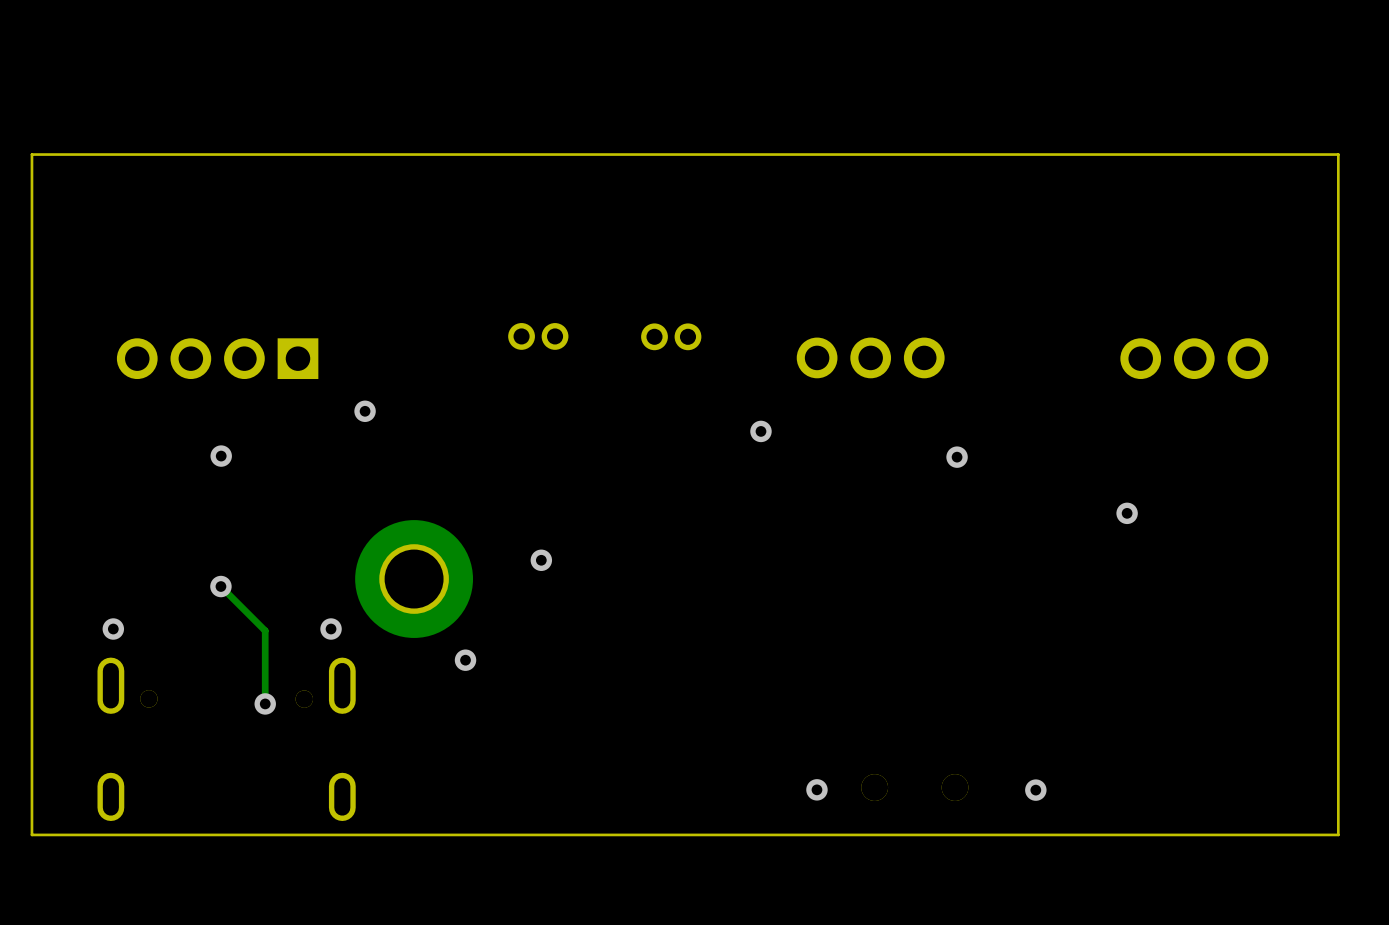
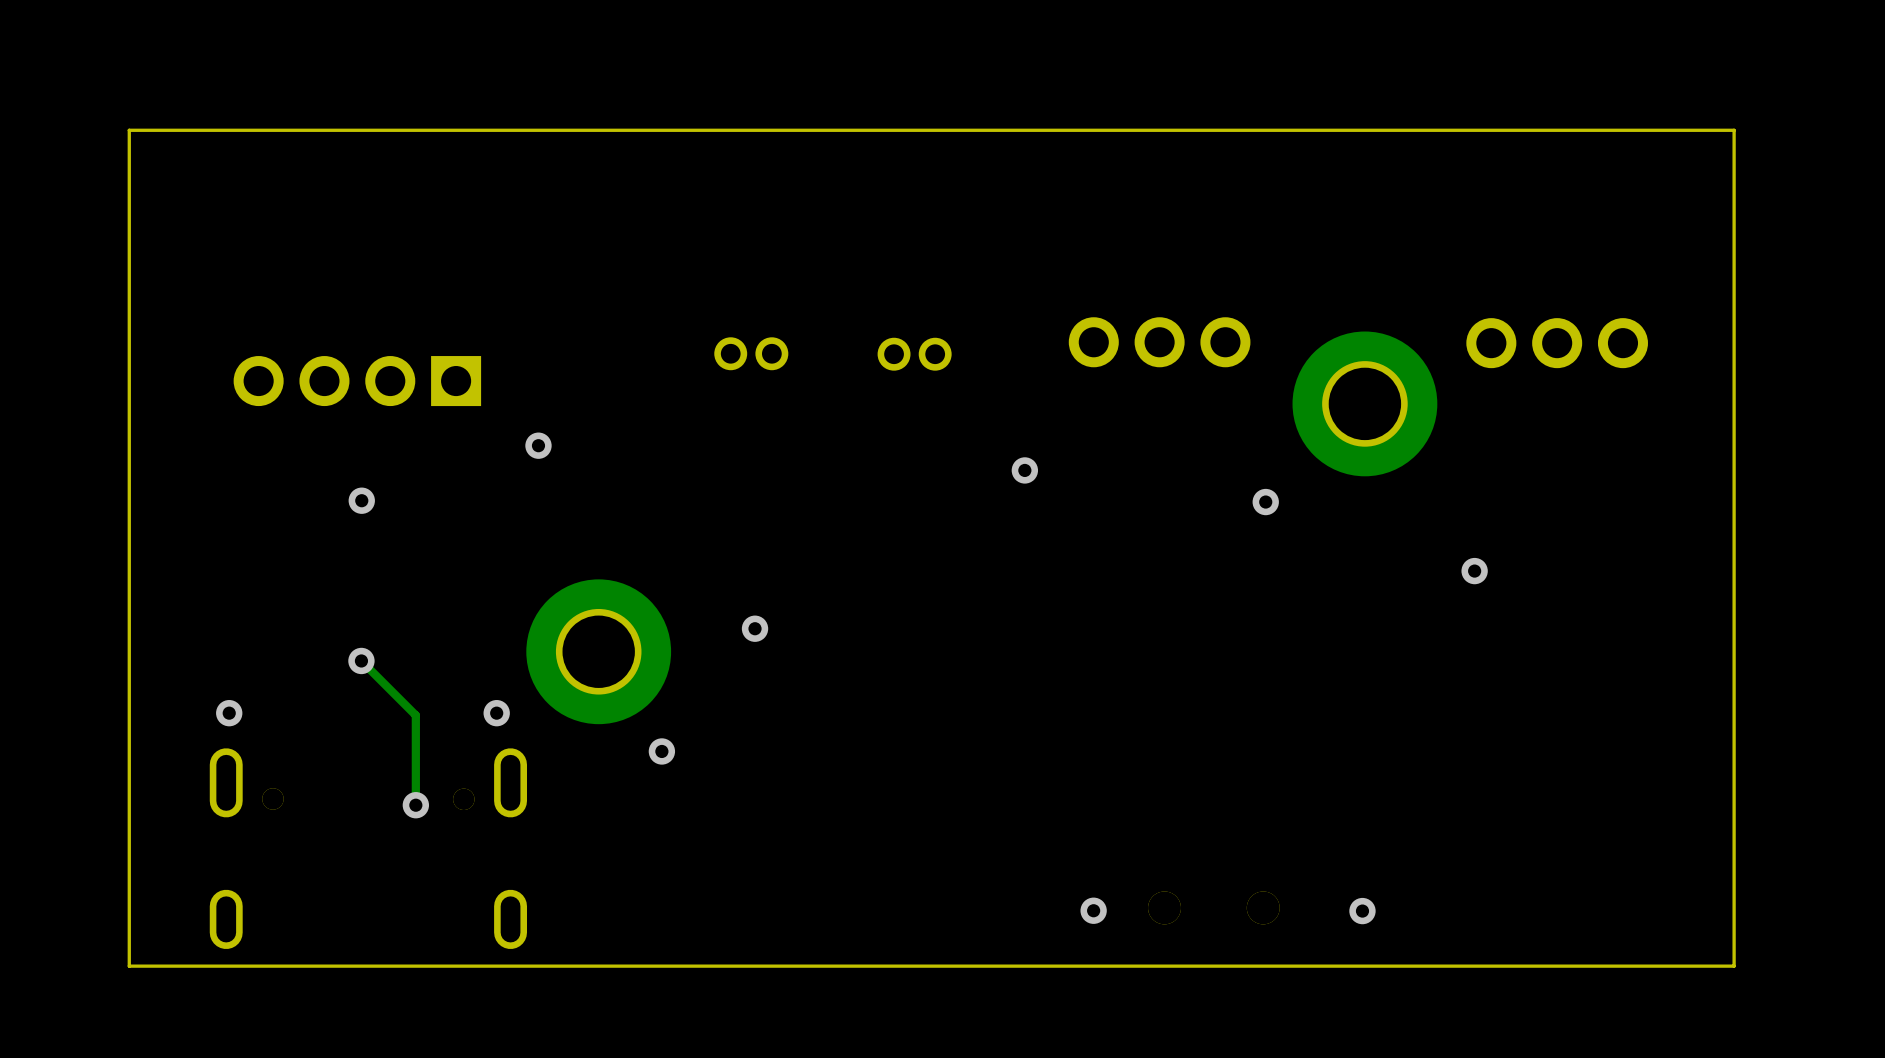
part position: (870, 357) -> (1159, 342)
part position: (1194, 358) -> (1557, 343)
part: none -> (1364, 403)

